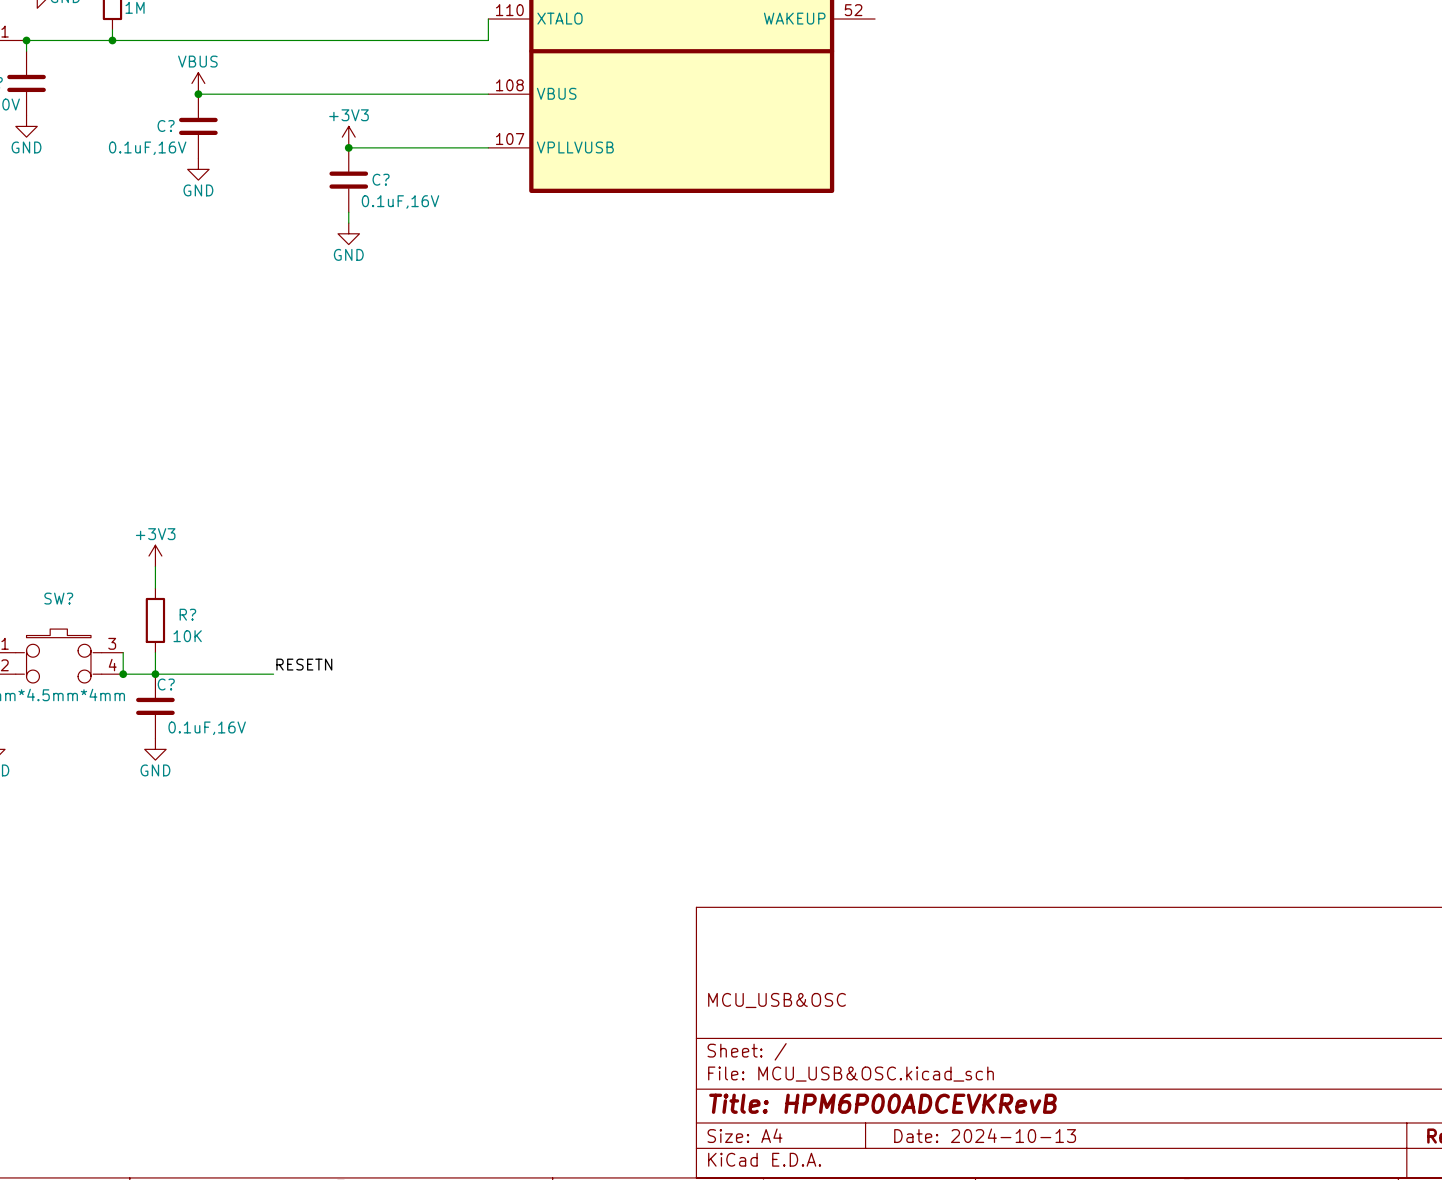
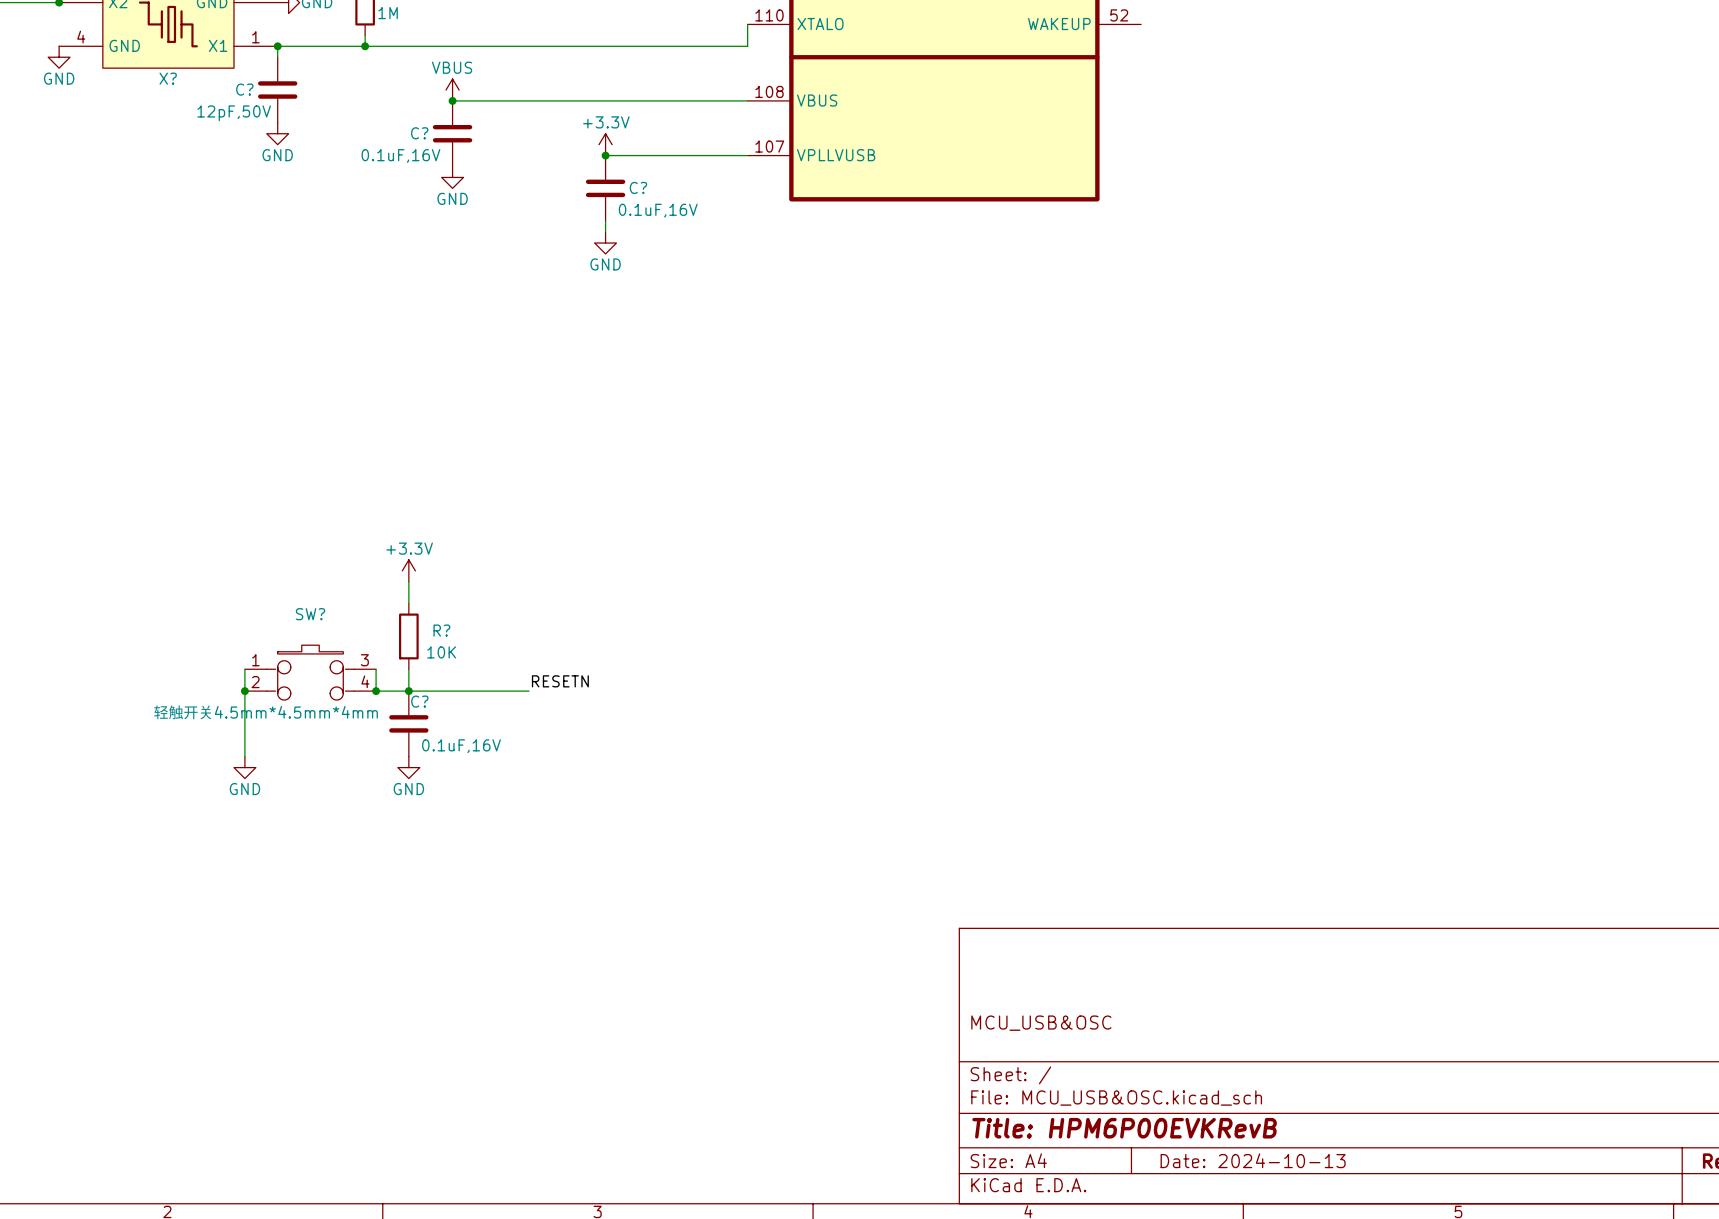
power symbol: +3V3 (348, 137) -> +3.3V (605, 144)
power symbol: +3V3 (155, 556) -> +3.3V (408, 570)
title block: Title: HPM6P00ADCEVKRevB (882, 1103) -> Title: HPM6P00EVKRevB (1124, 1128)

